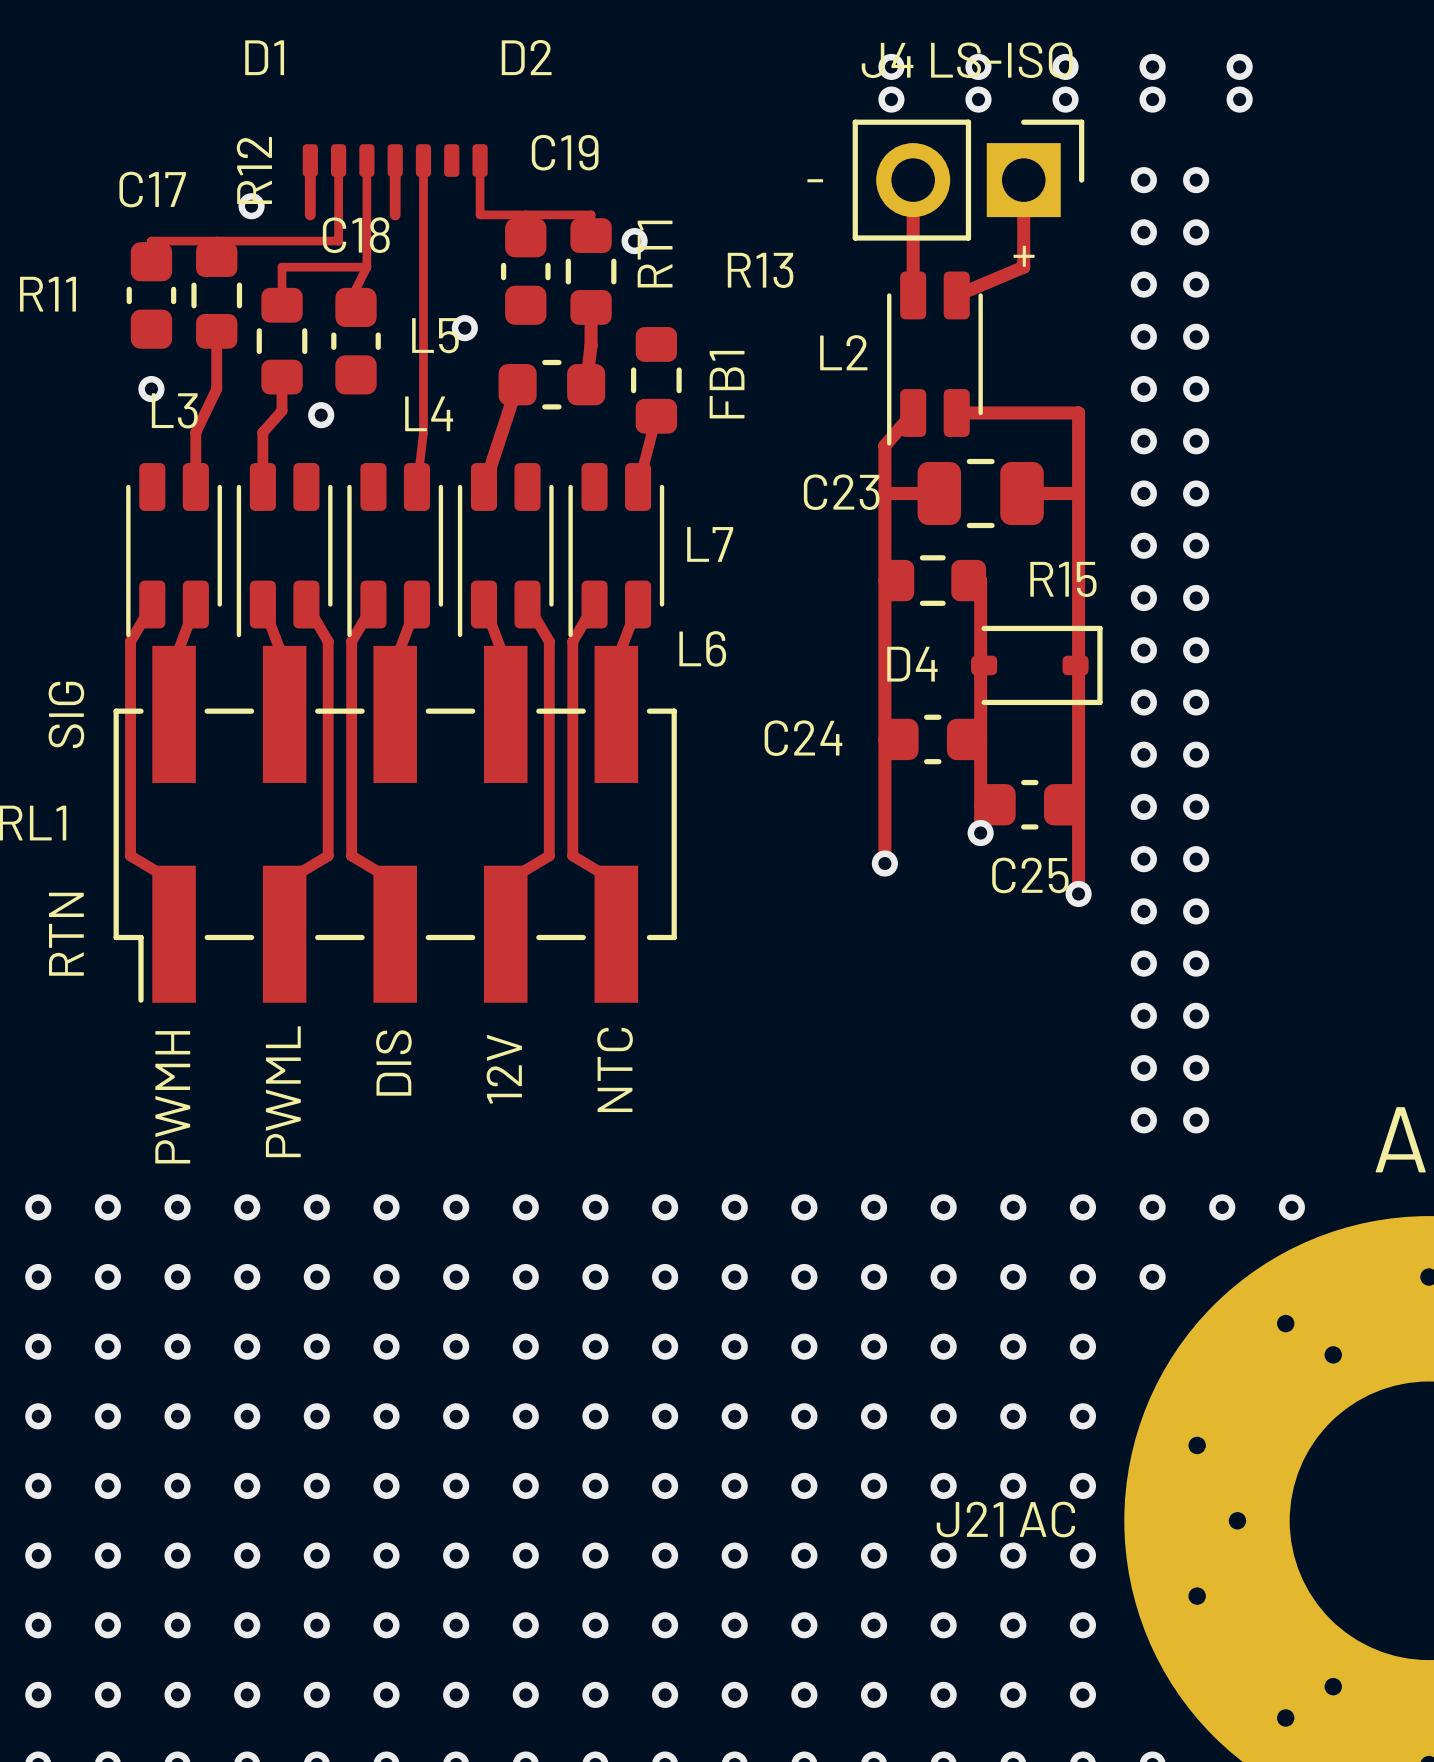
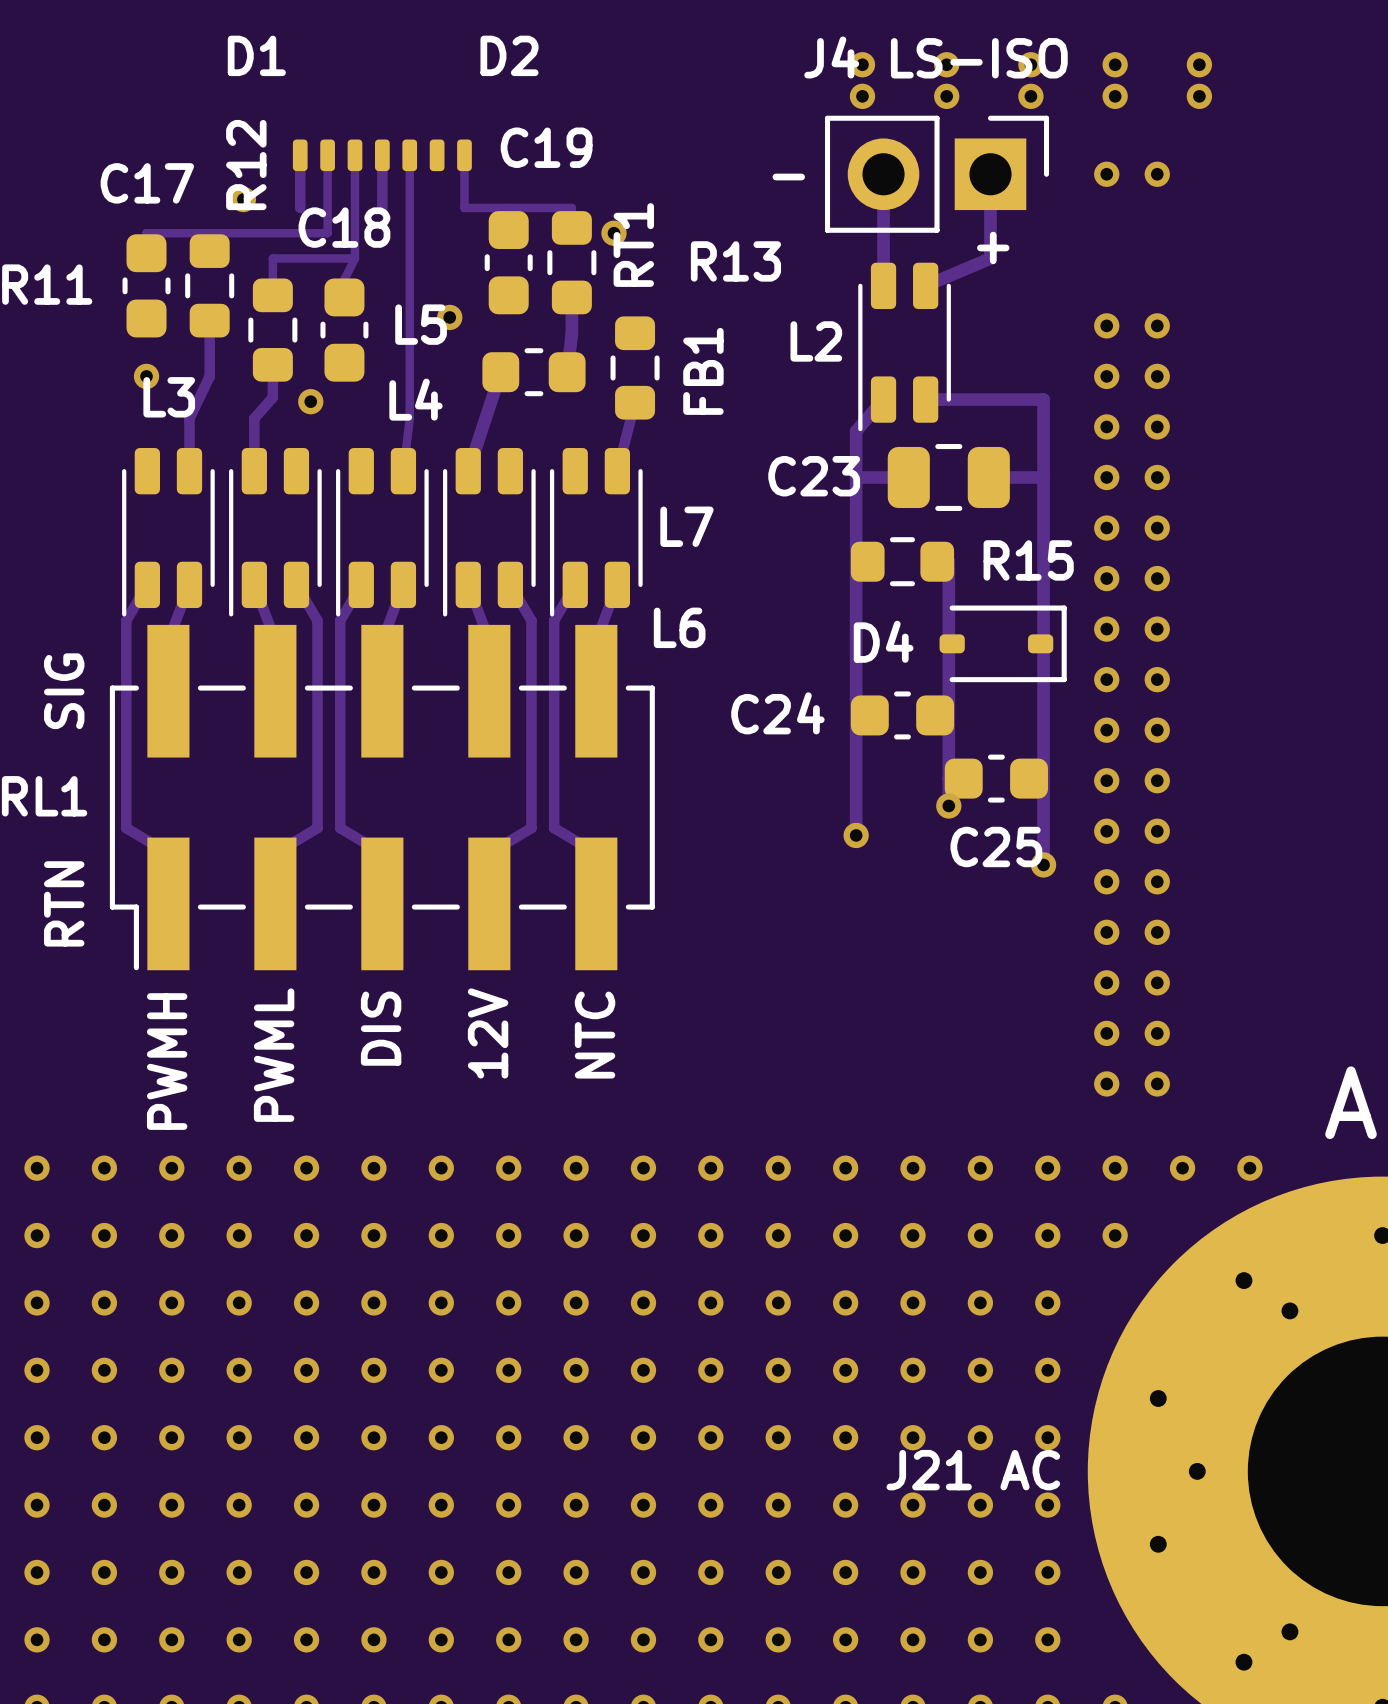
via: (1143, 232) -> none
via: (1196, 232) -> none
via: (1143, 284) -> none
via: (1196, 284) -> none

